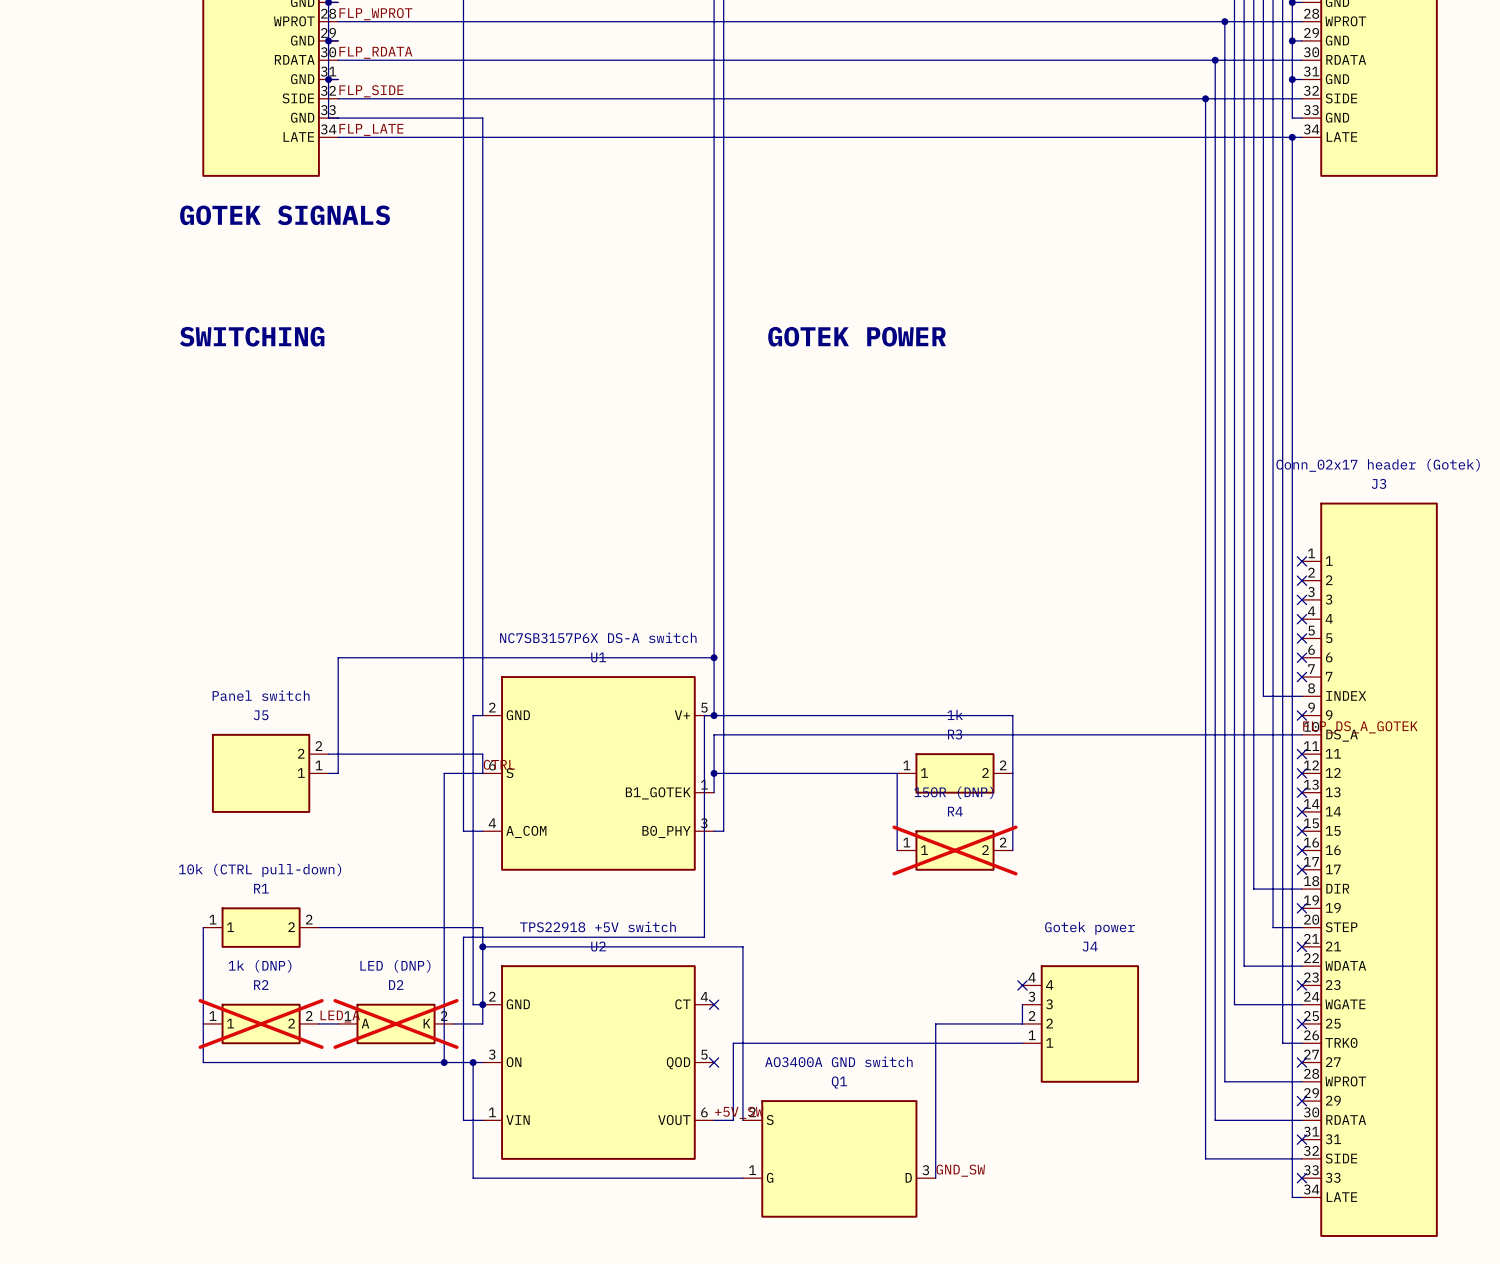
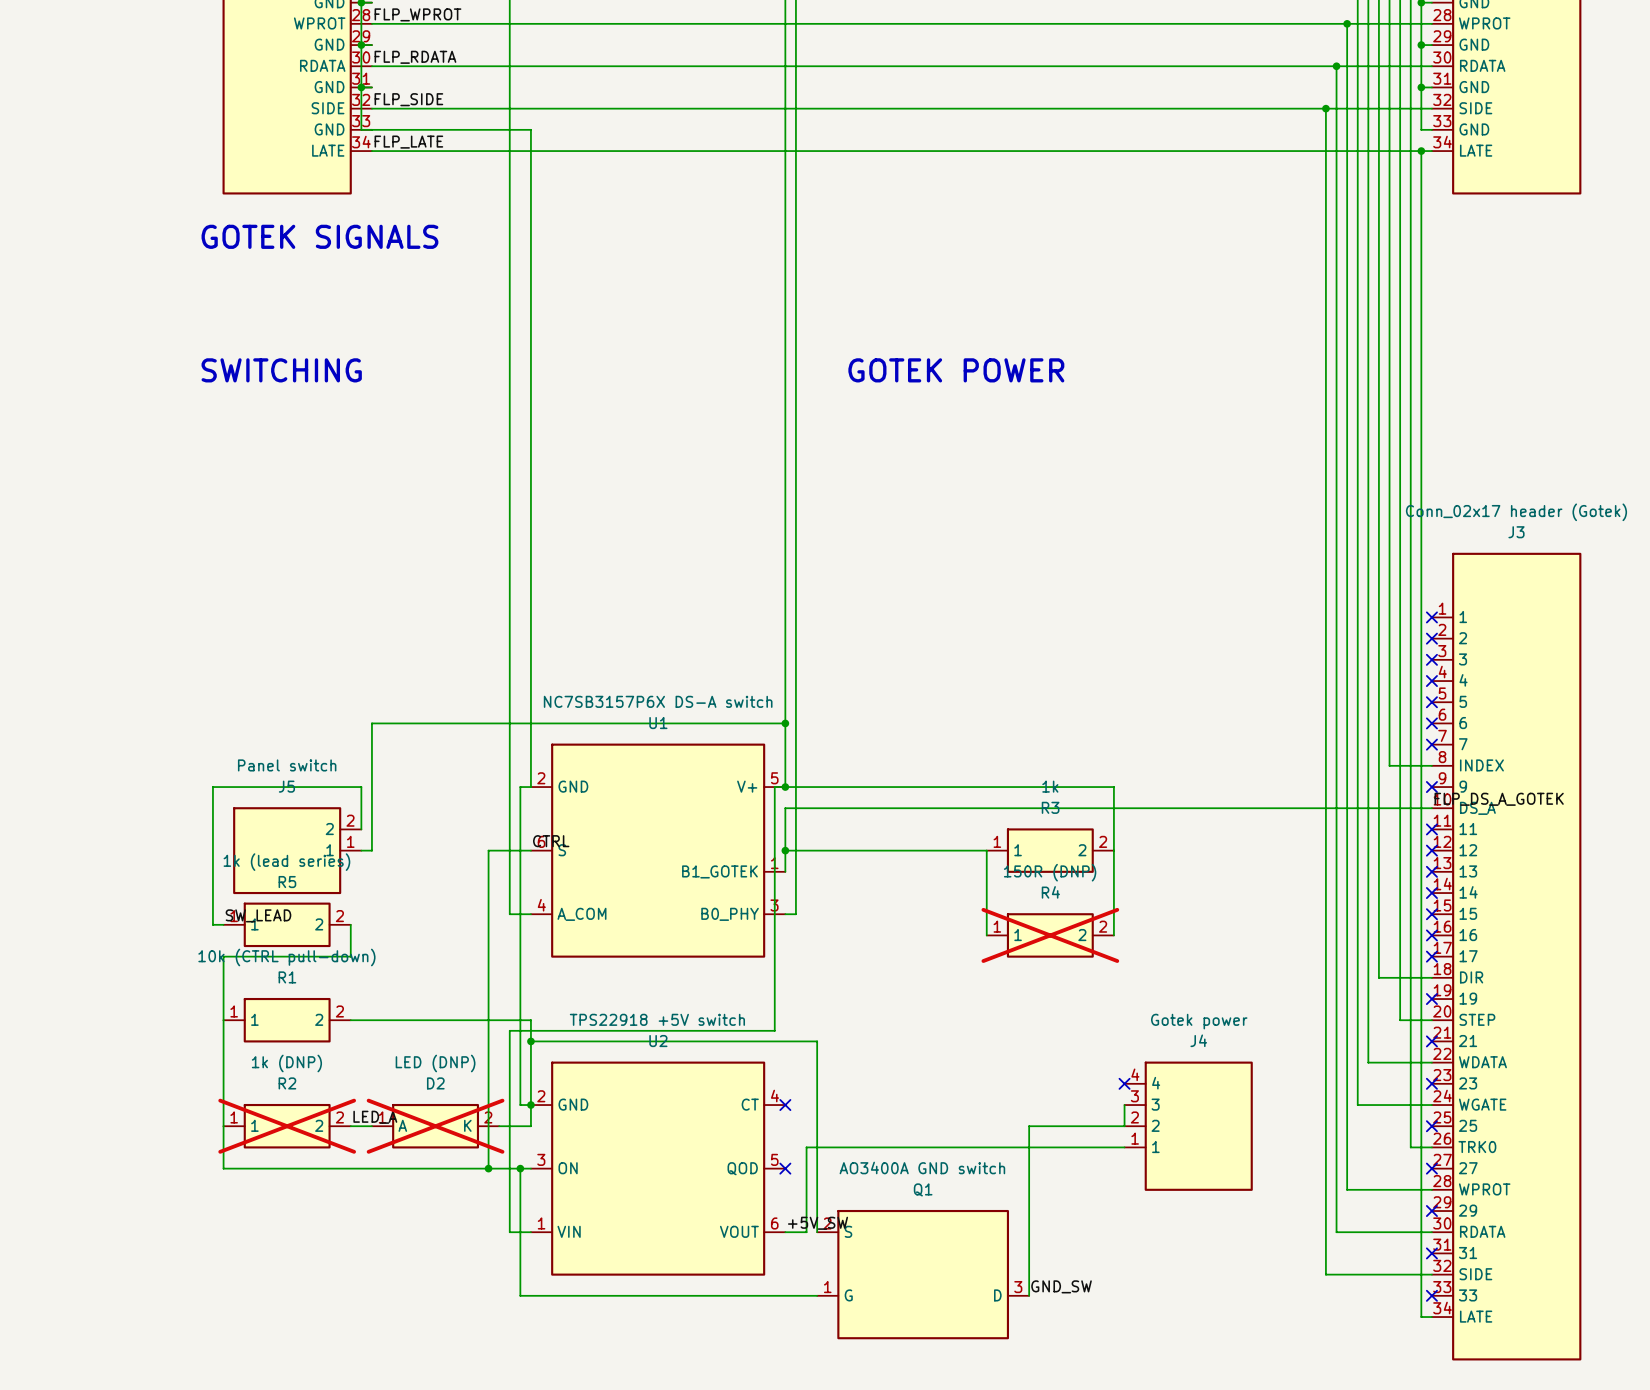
wire: (328, 754) (482, 754) (482, 773) -> (361, 829) (361, 787) (212, 787) (212, 924) (223, 924)
label: none -> SW_LEAD (258, 915)
R5: none -> 1k (lead series) (287, 924)
wire: none -> (350, 924) (350, 956) (223, 956) (223, 1020)

